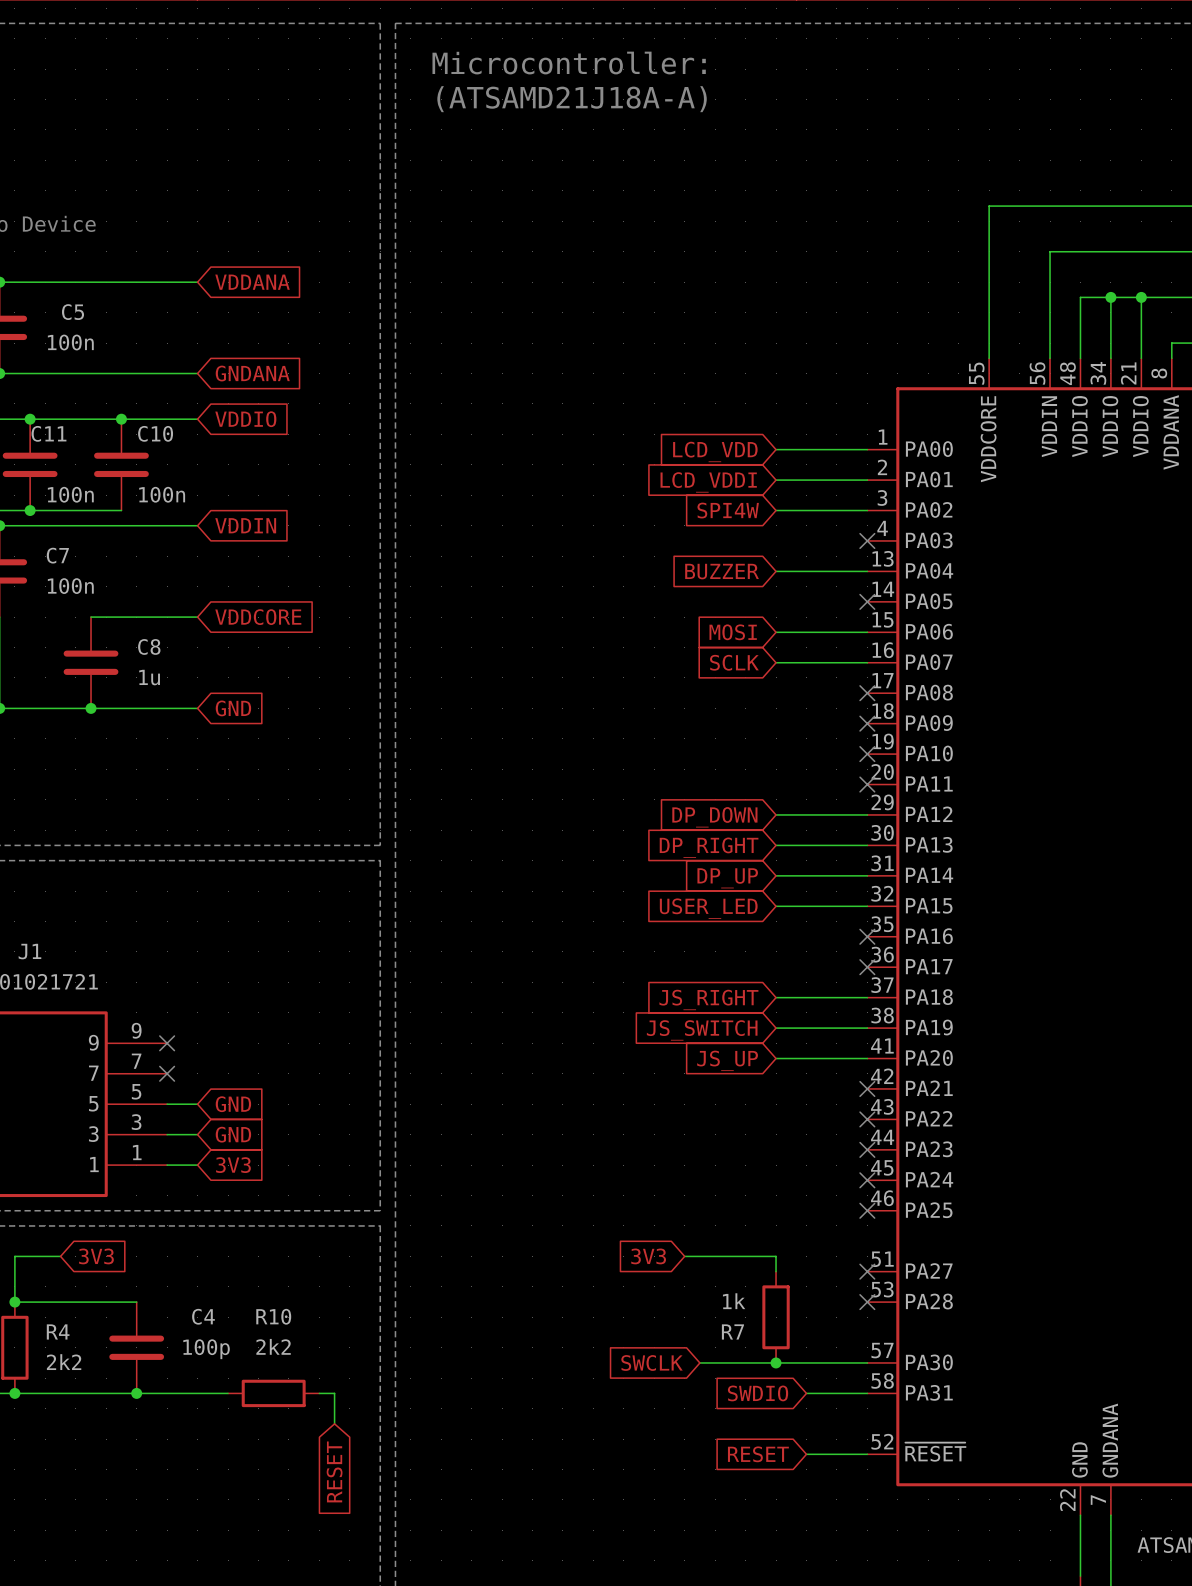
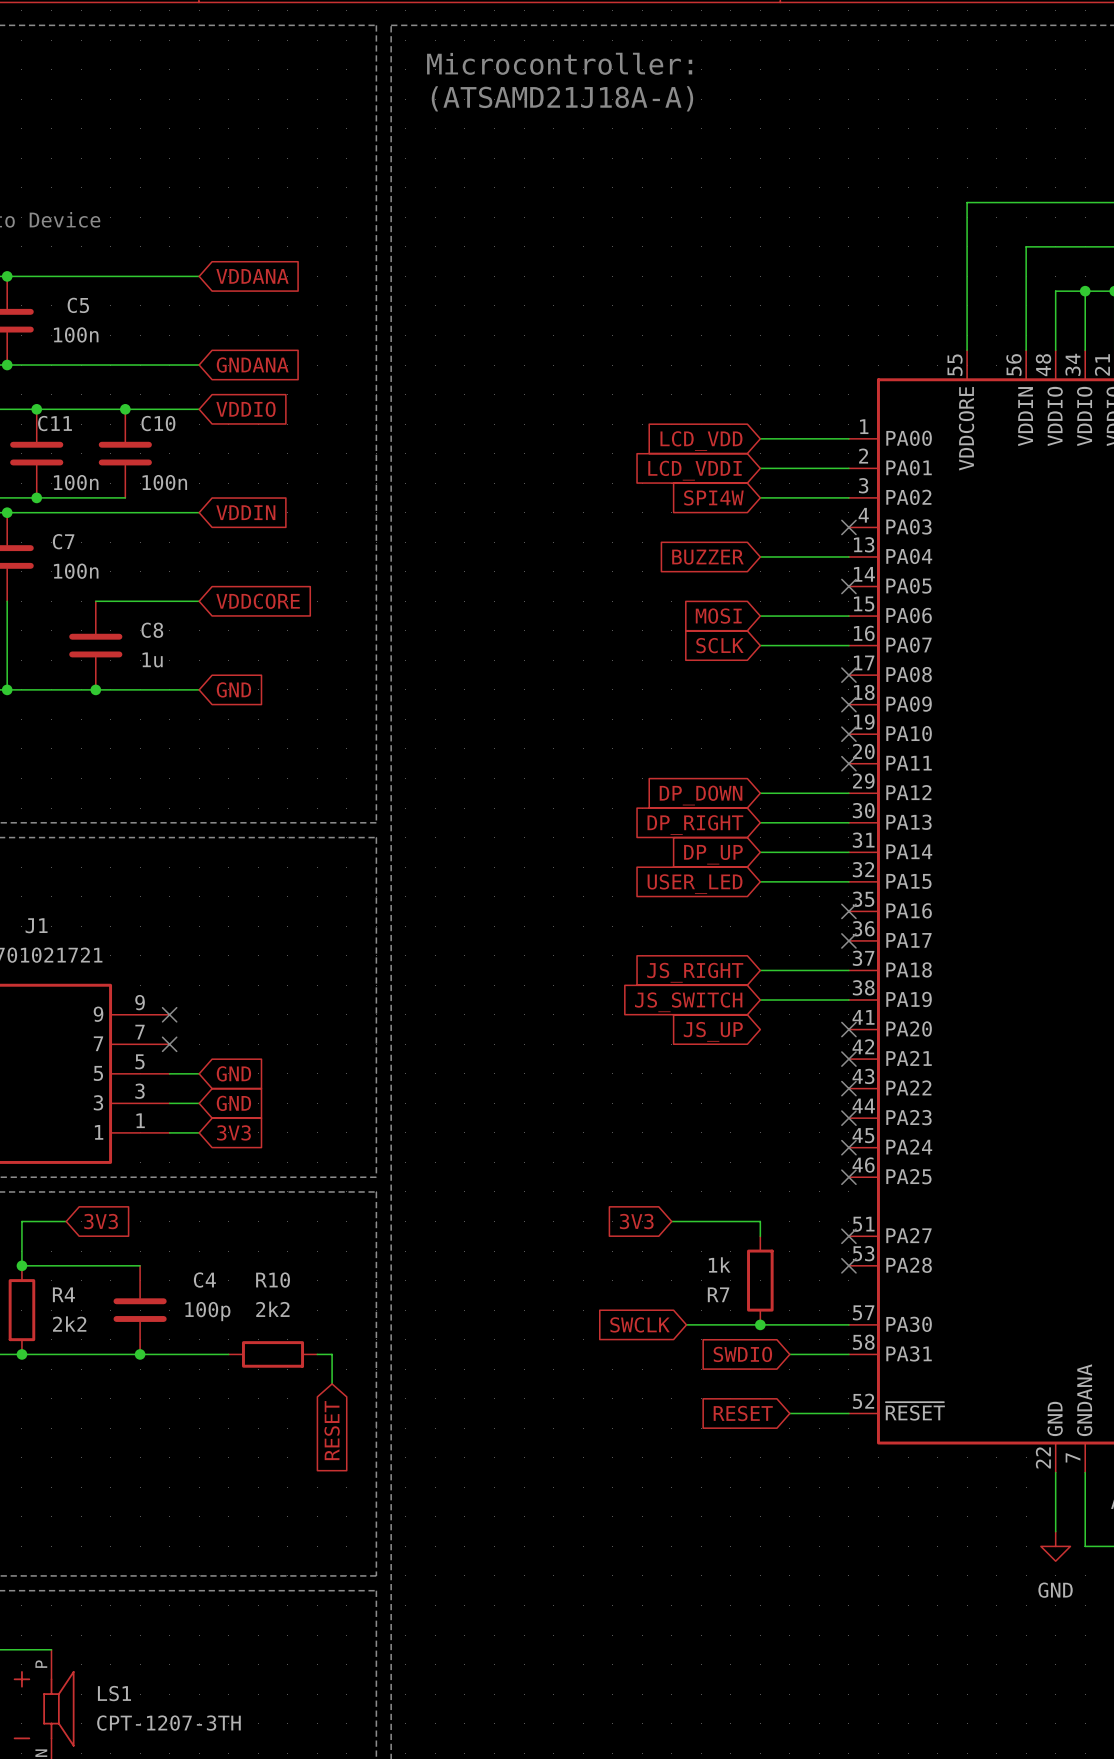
wire: (776, 1058) (867, 1058) -> none
no-connect mark: none -> (848, 1029)

